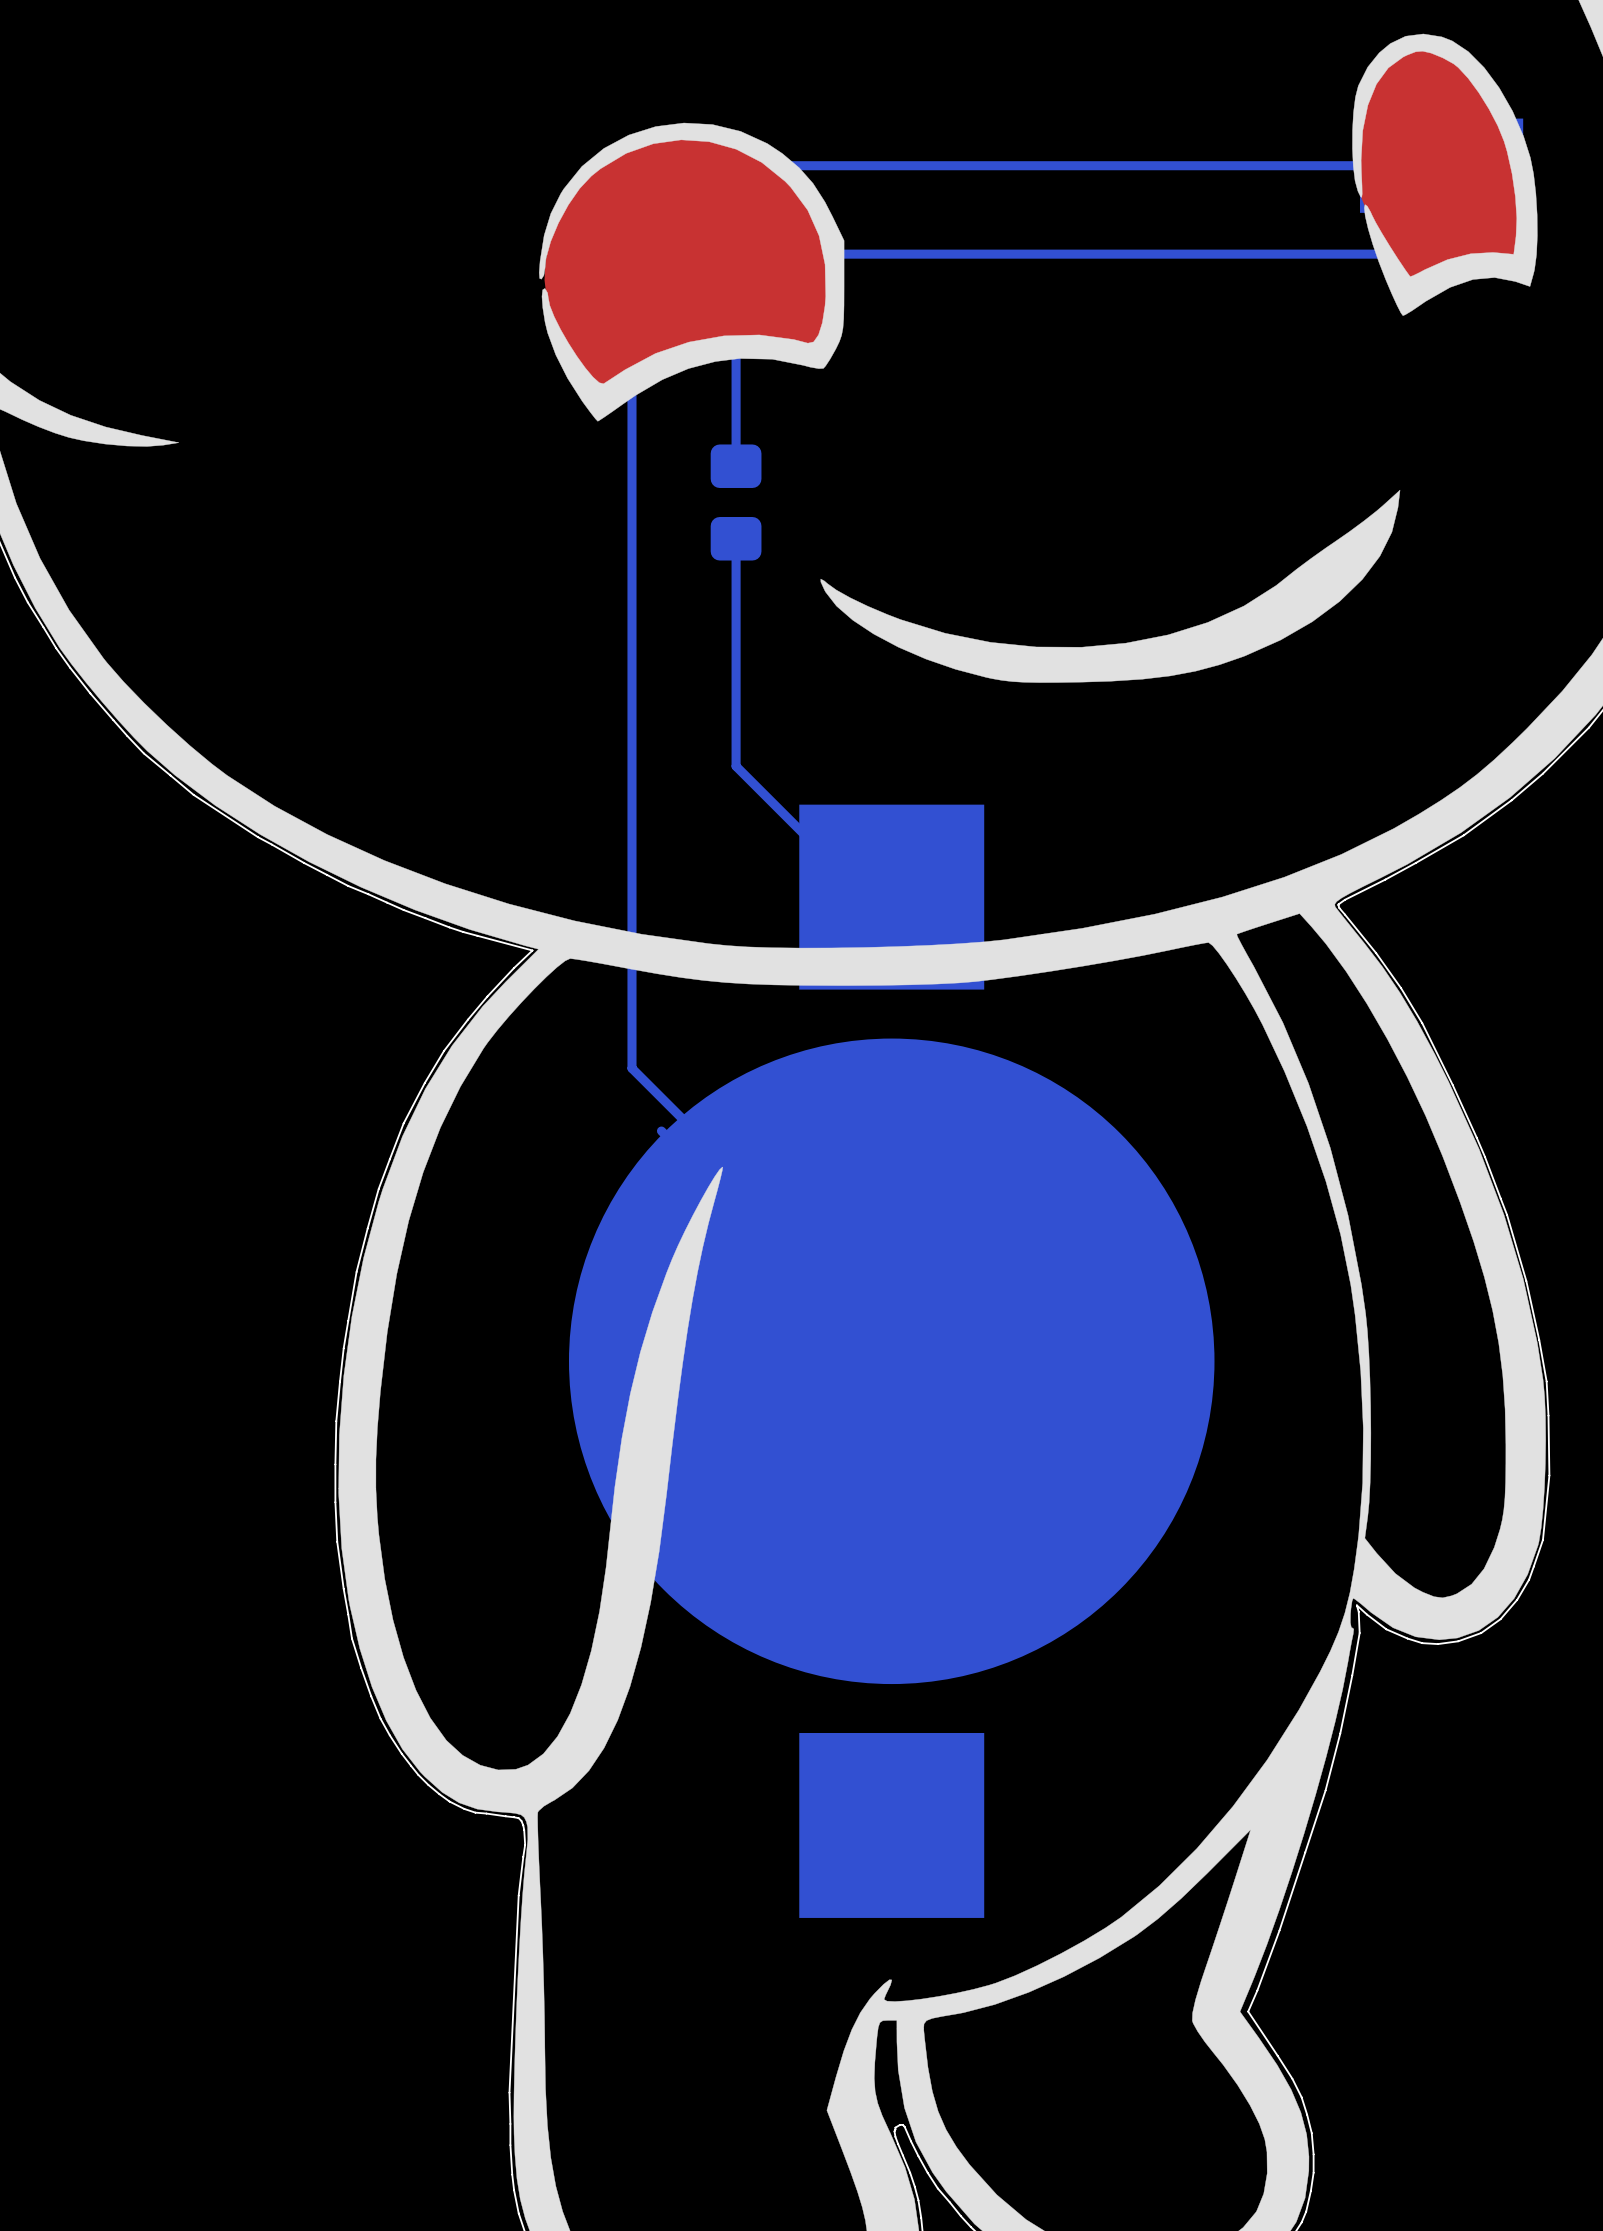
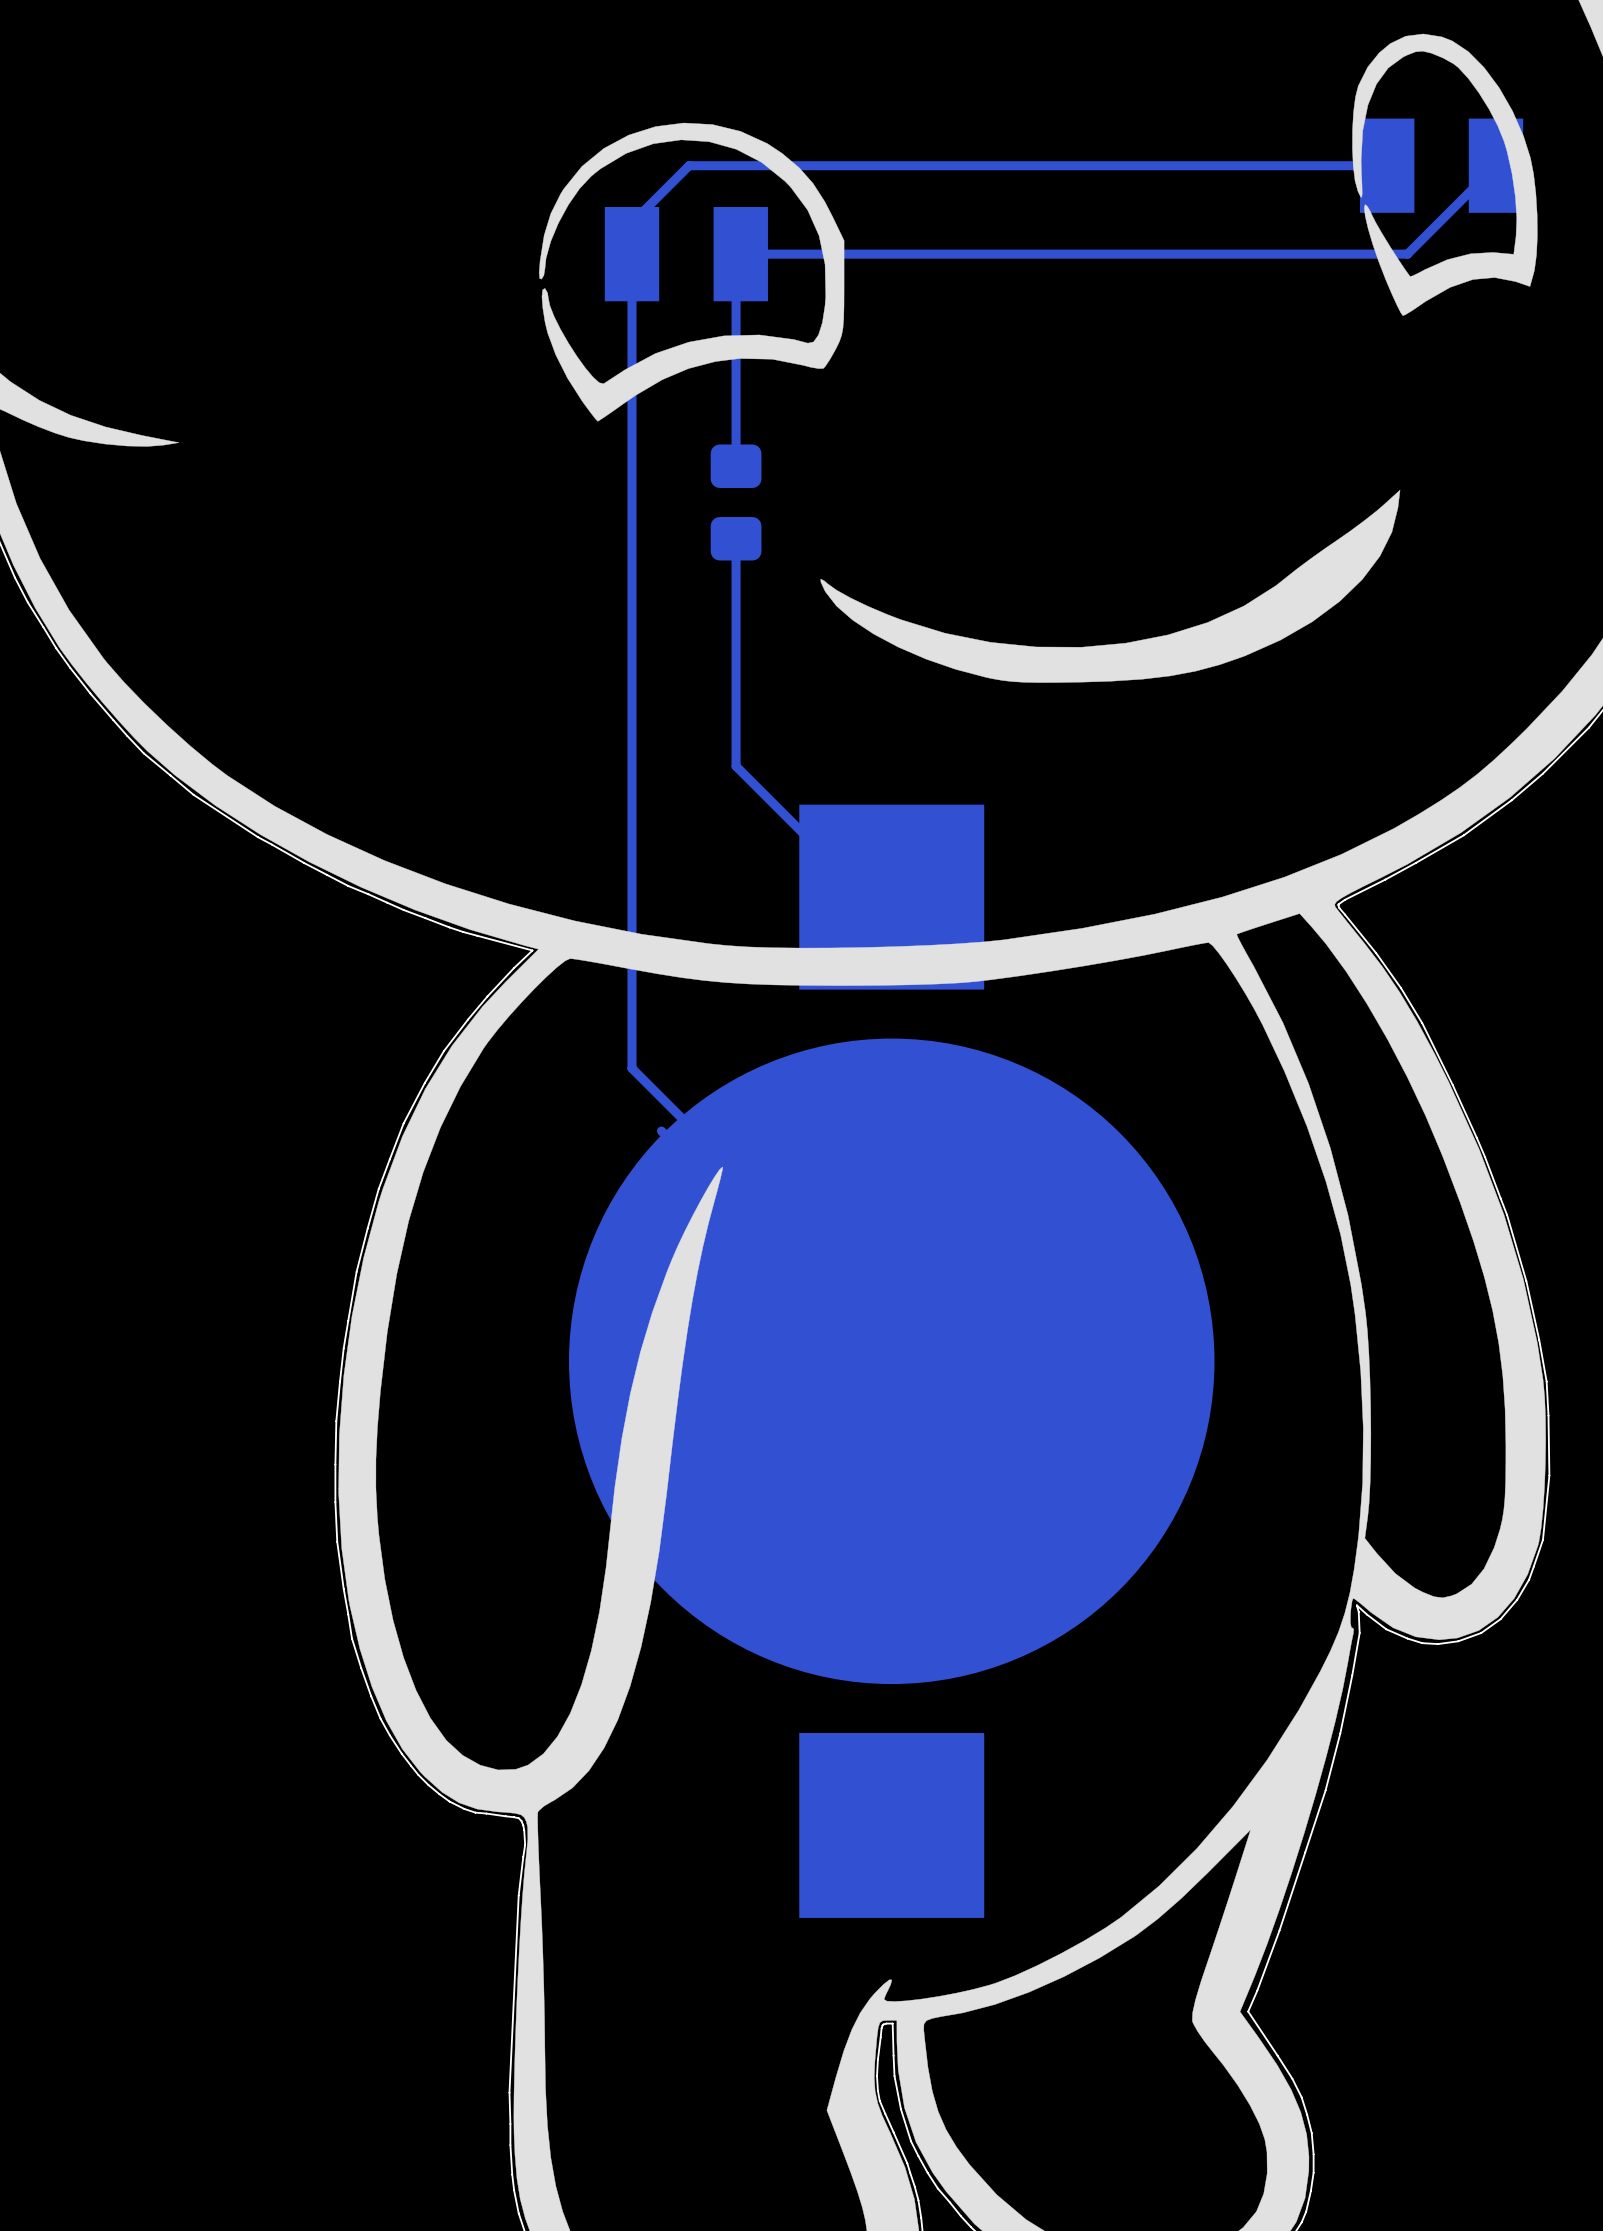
drawing: [1358, 45, 1529, 300] -> none
drawing: [544, 134, 839, 403] -> none
board edge: (911, 2141) (902, 2124) (895, 2127) (895, 2136) (910, 2172) -> (911, 2141) (900, 2109) (894, 2076) (892, 2023) (886, 2023) (881, 2028) (877, 2059) (877, 2090) (879, 2100) (910, 2172)

